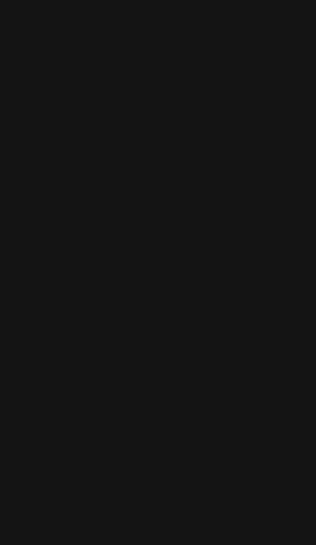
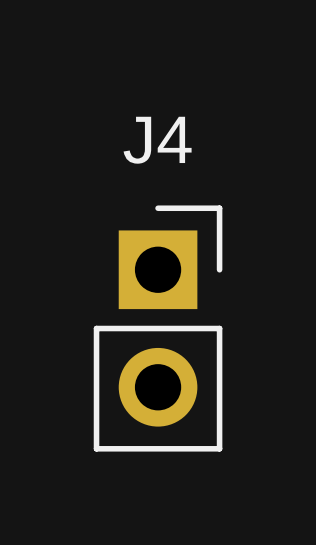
J4: none -> (158, 328)

